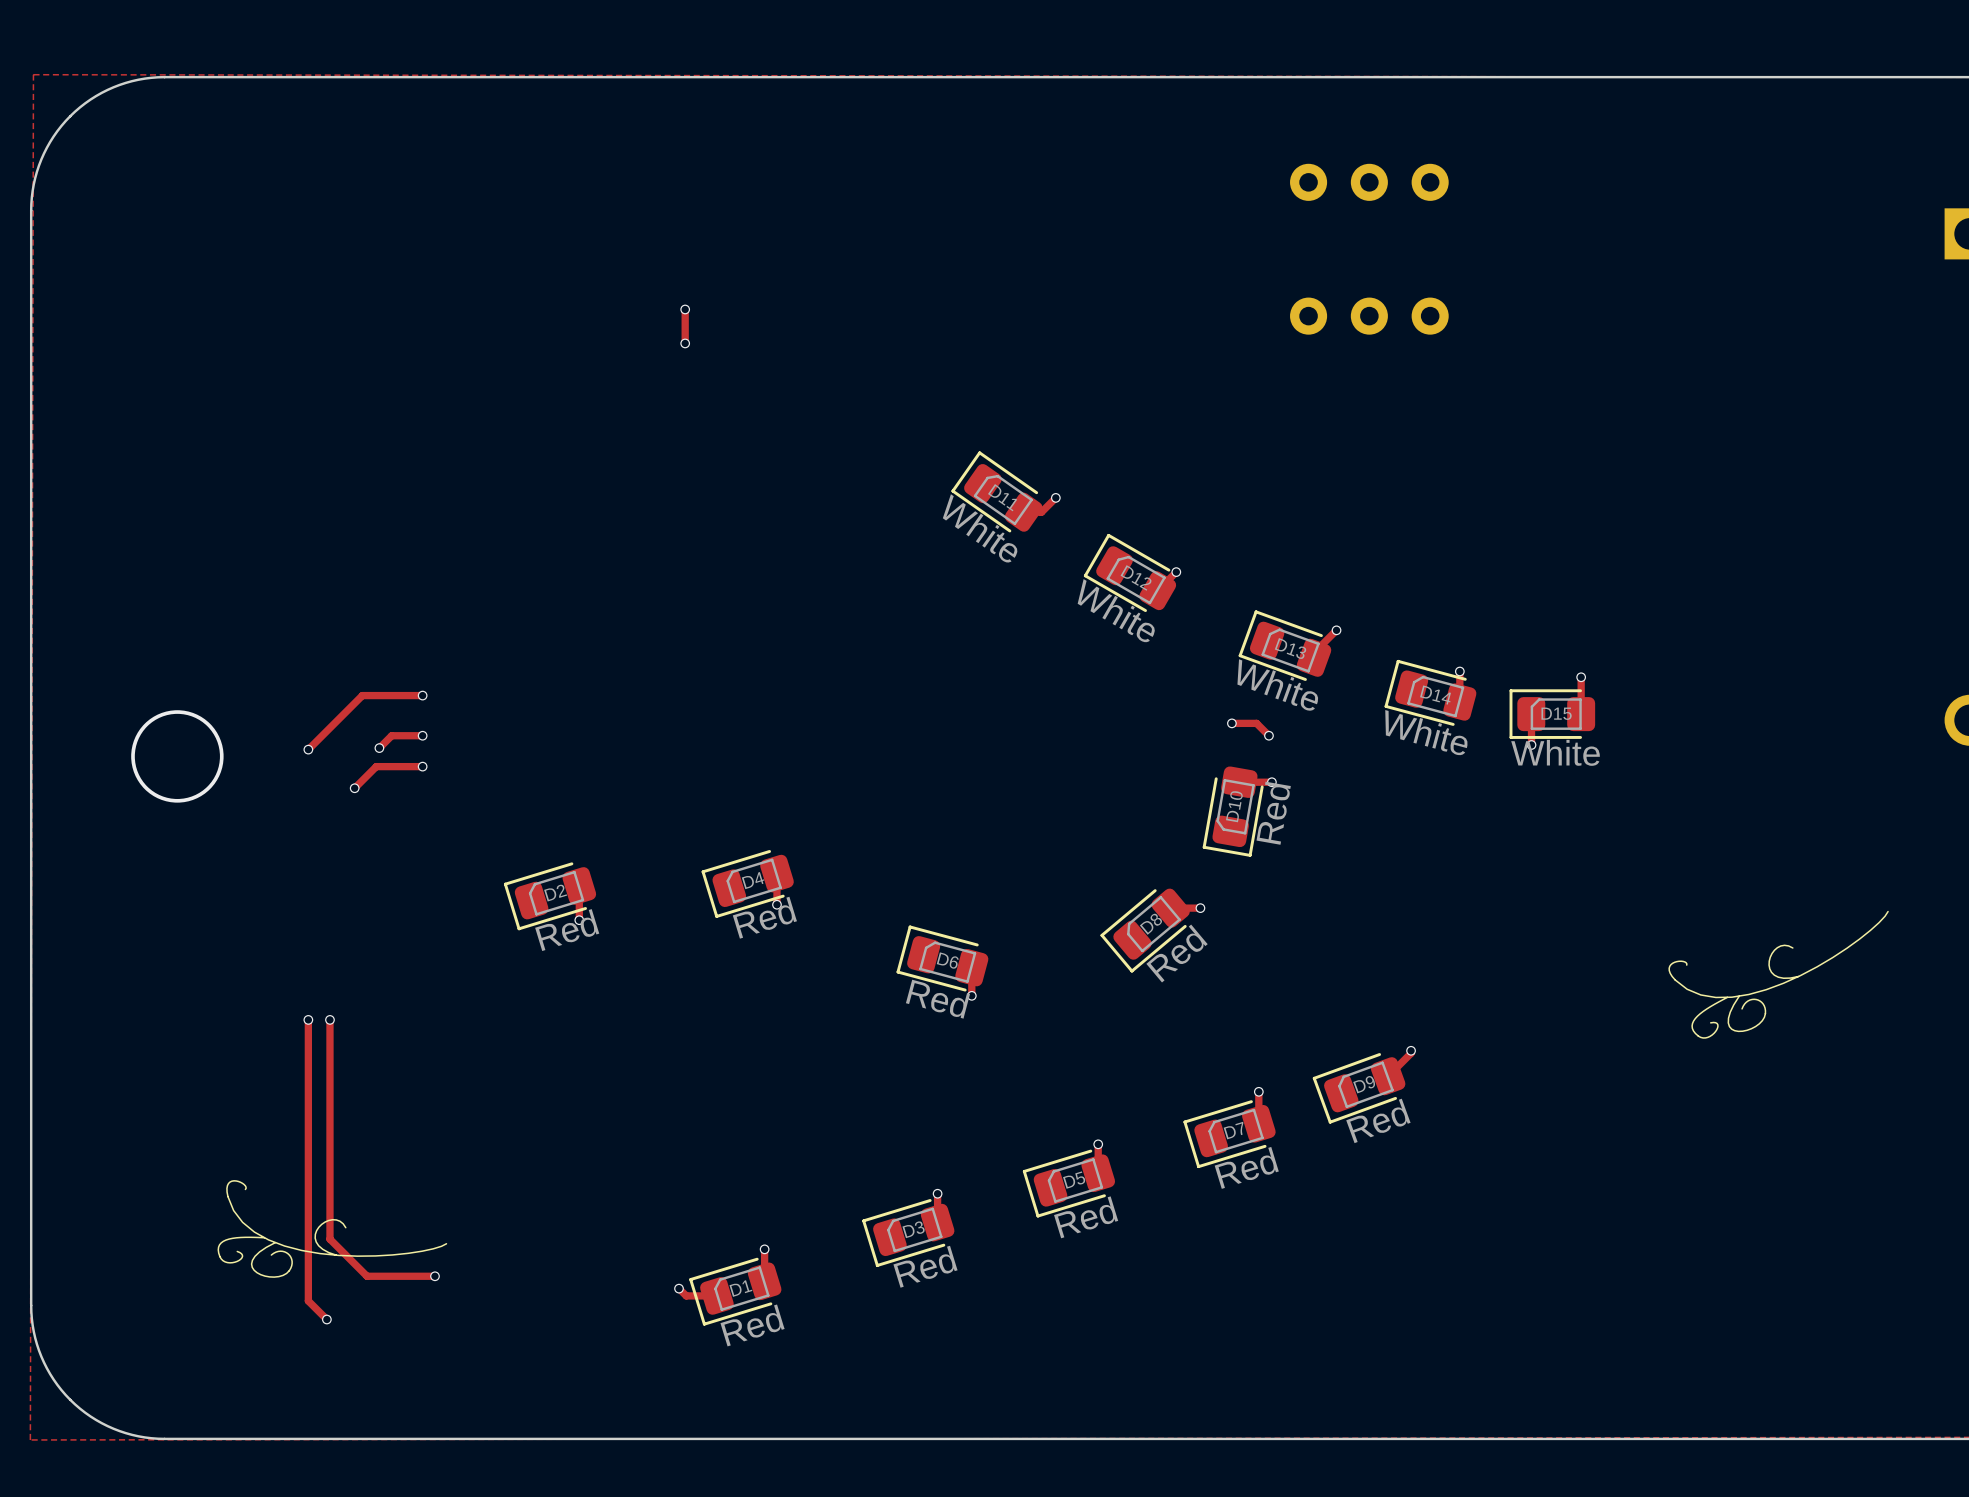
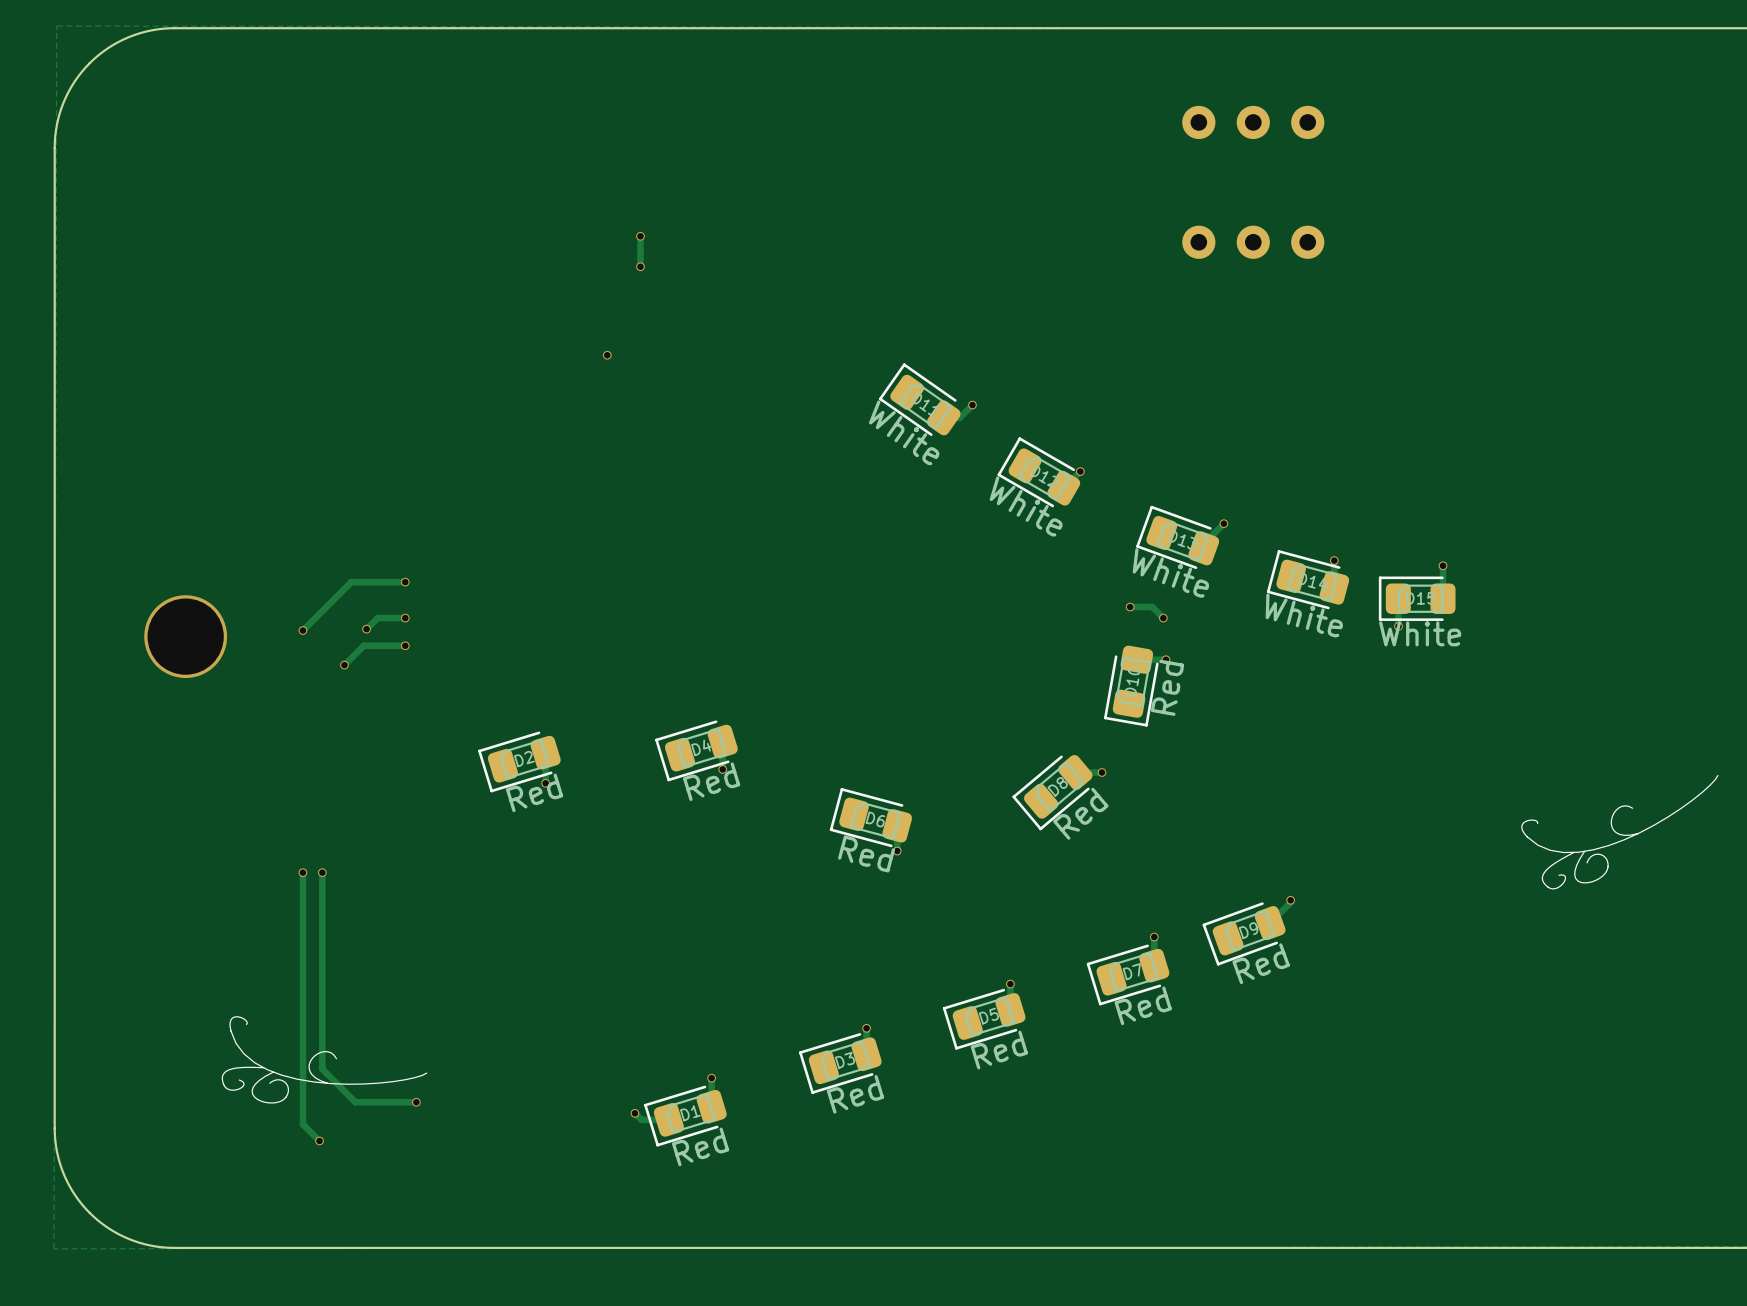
via: none -> (607, 355)

